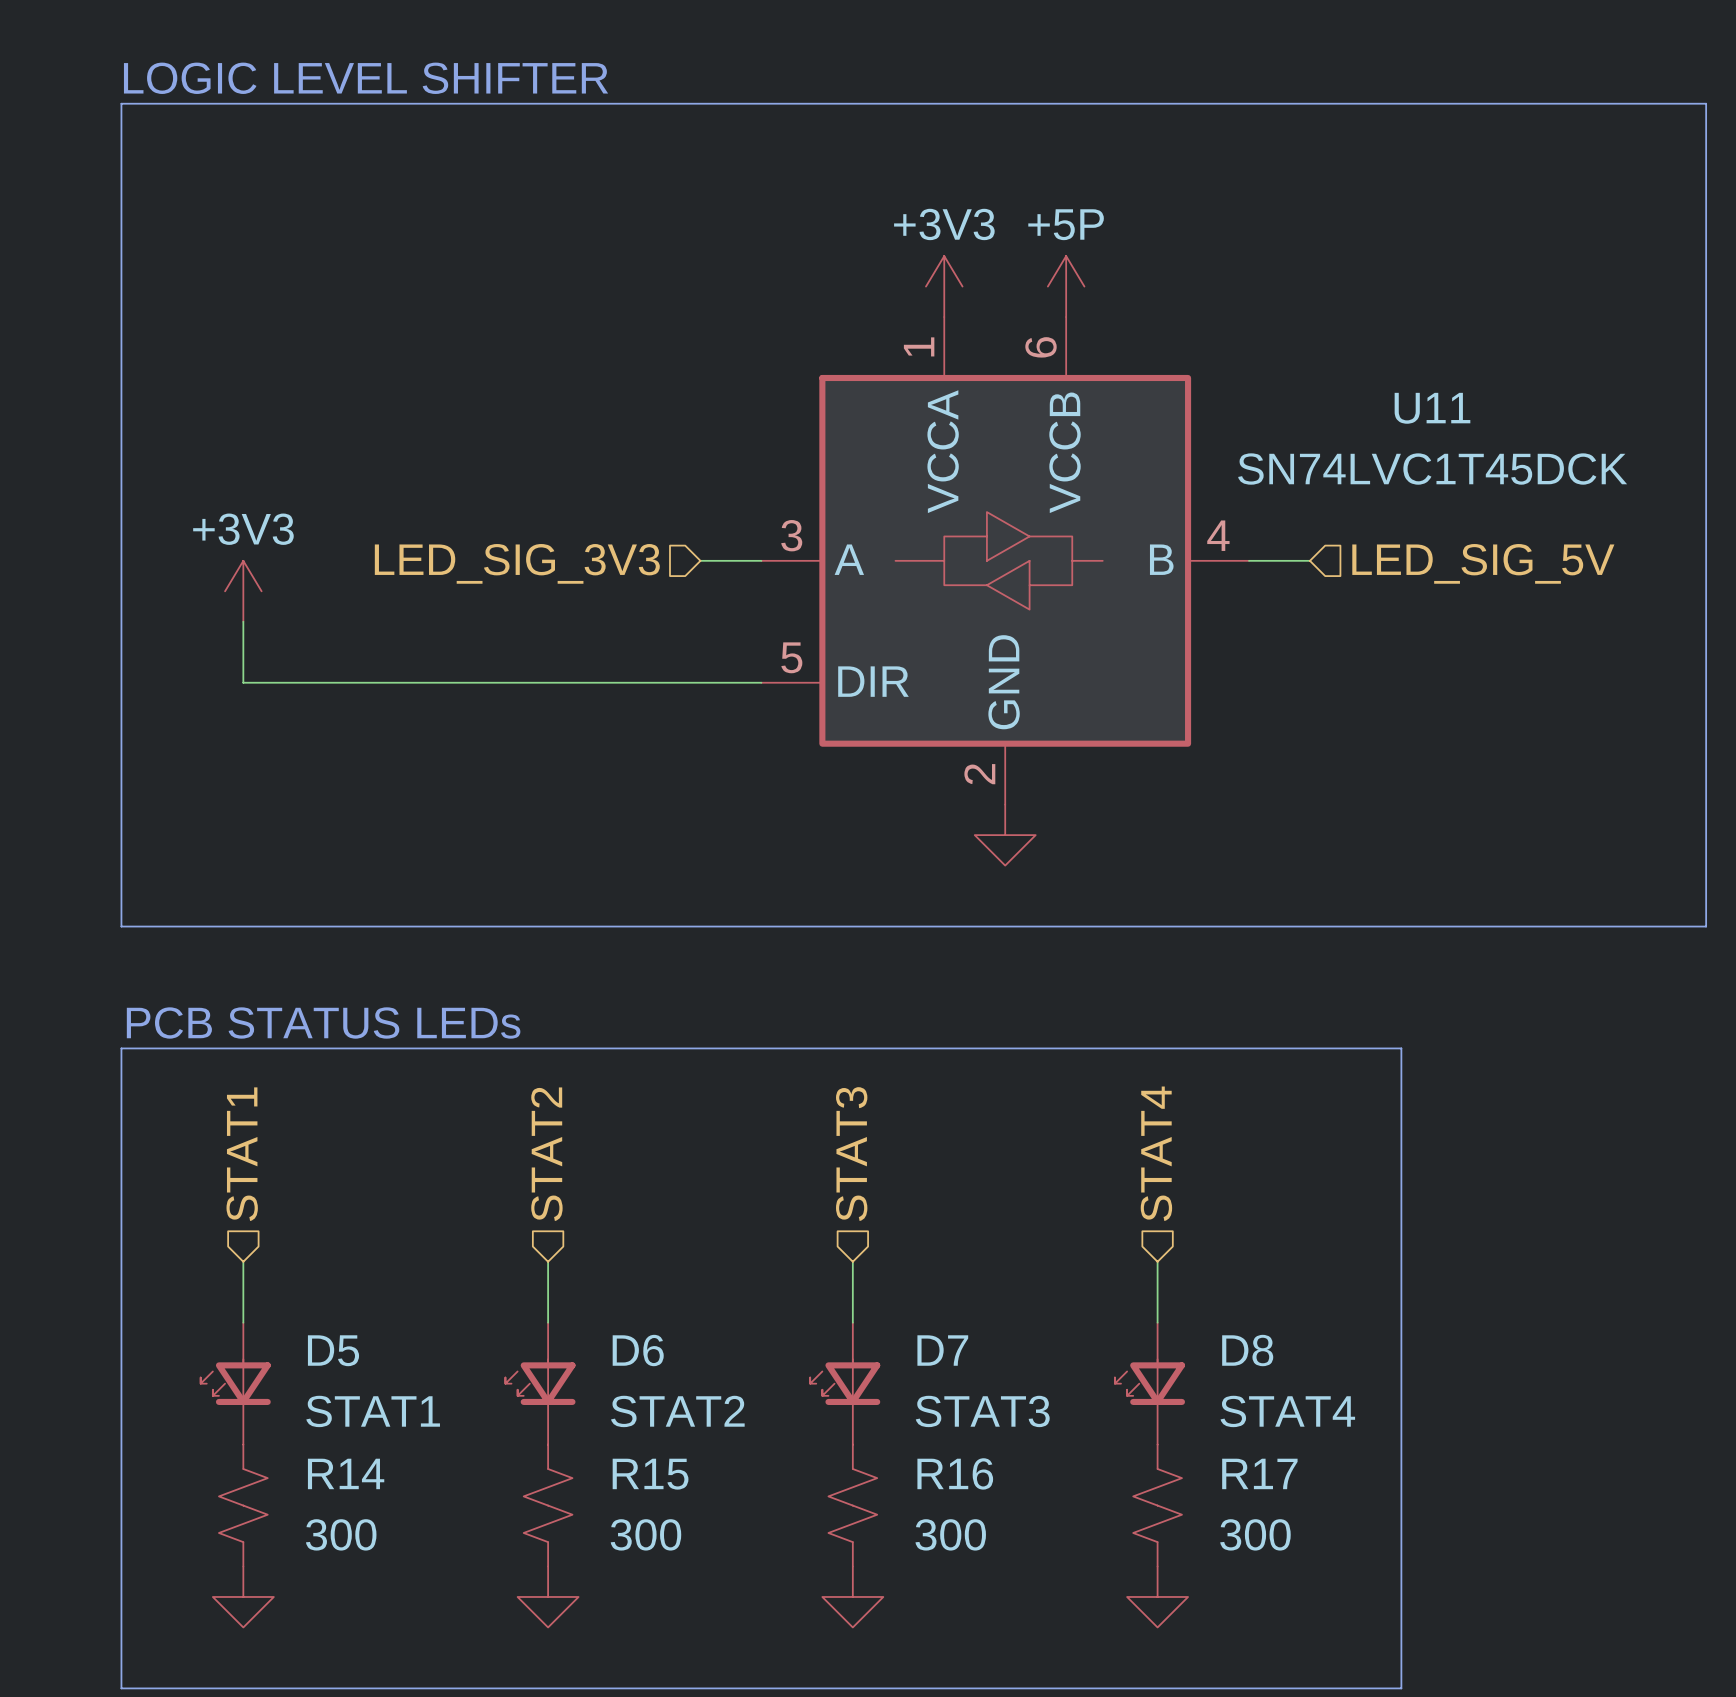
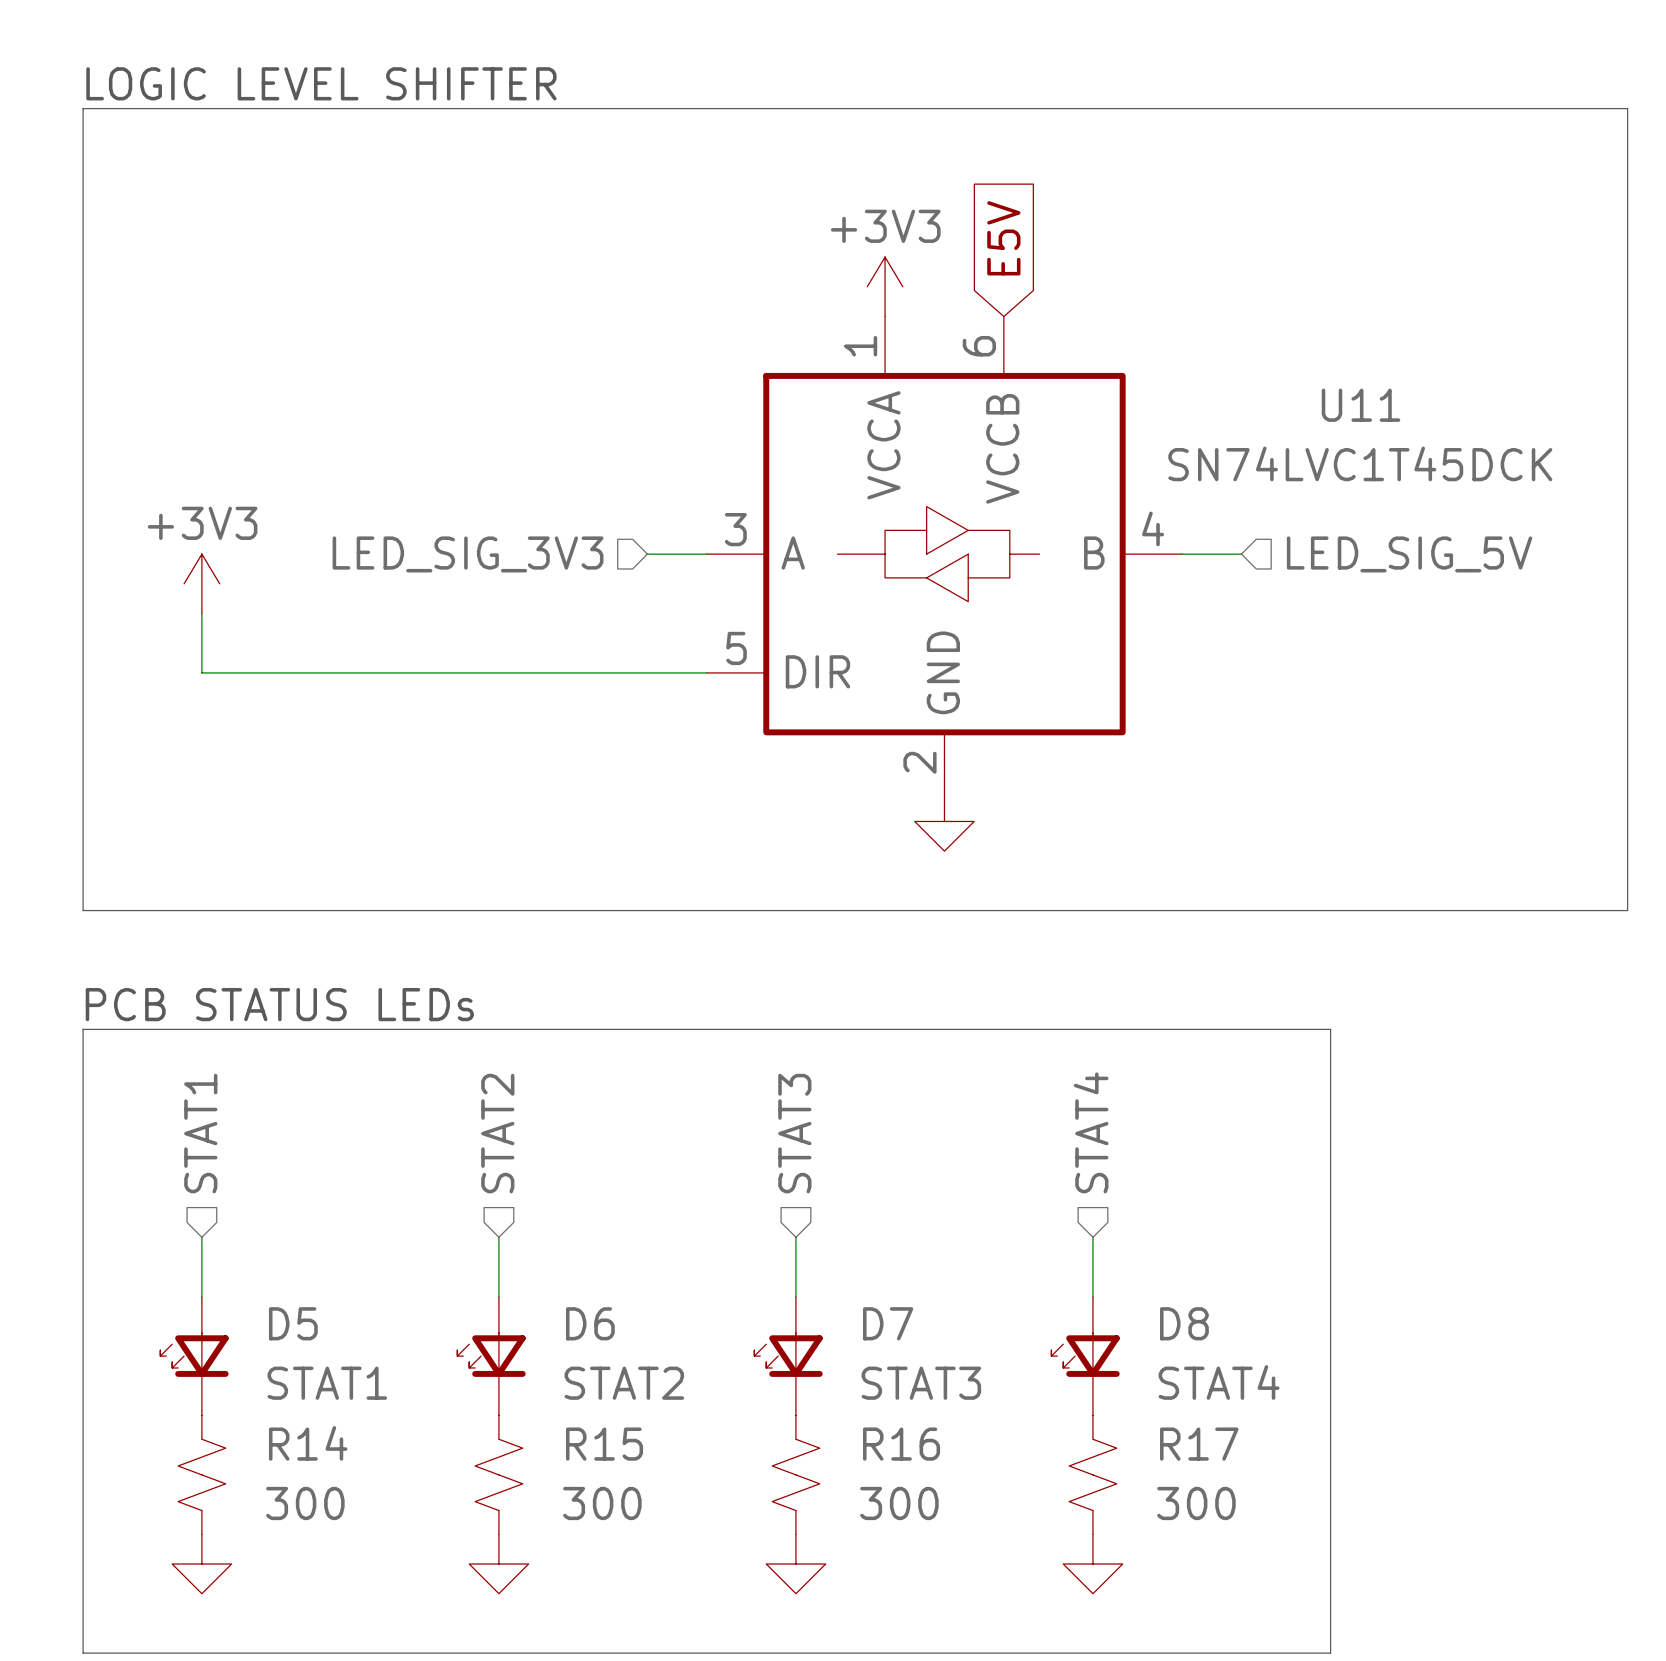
global label: none -> E5V (1003, 238)
power symbol: +5P (1066, 286) -> none

